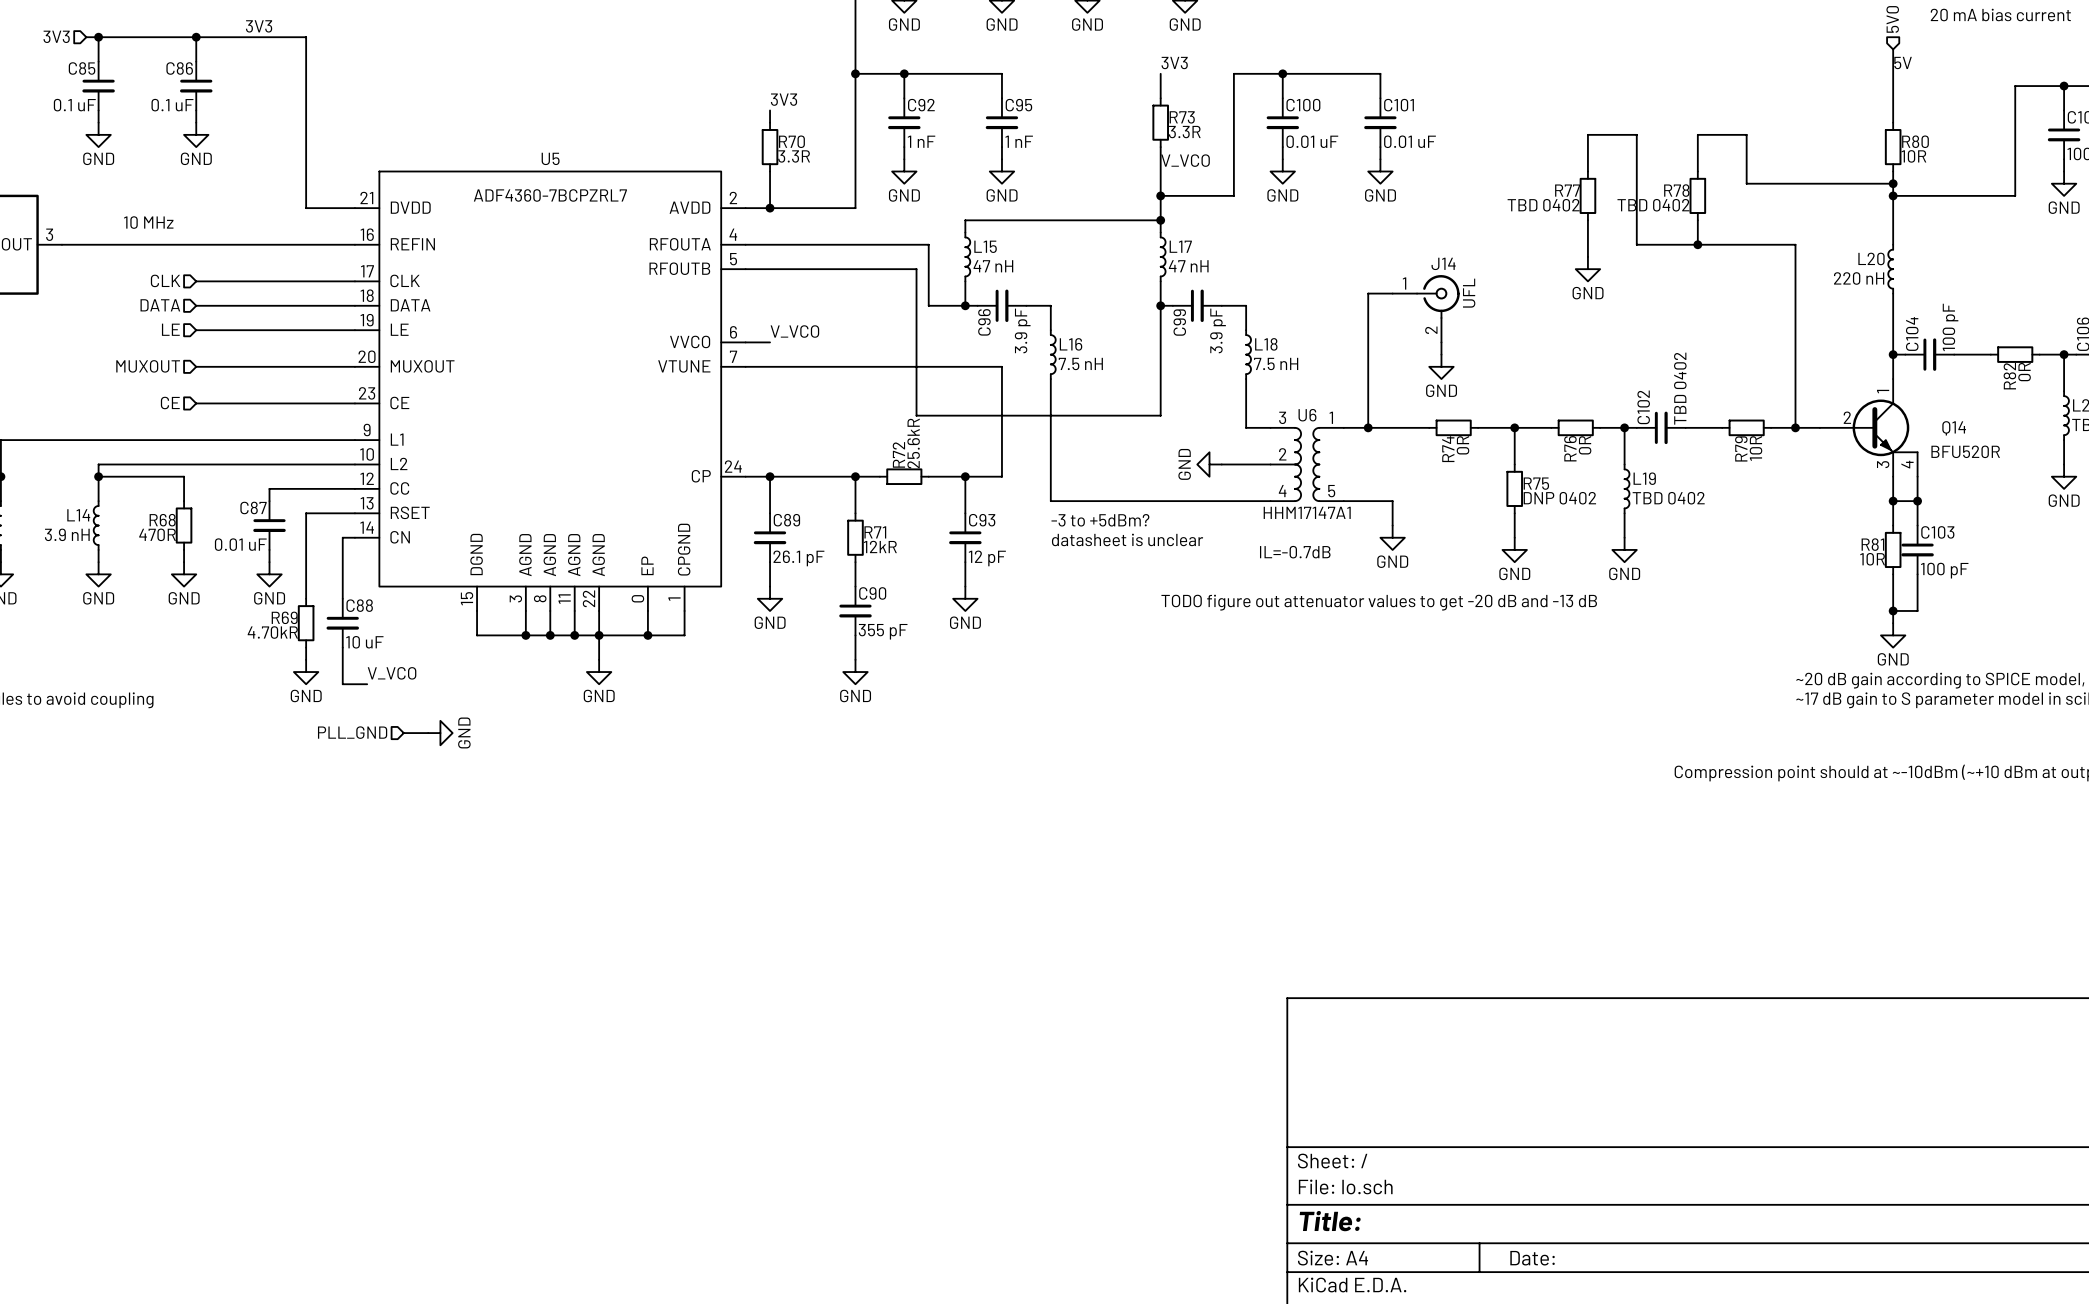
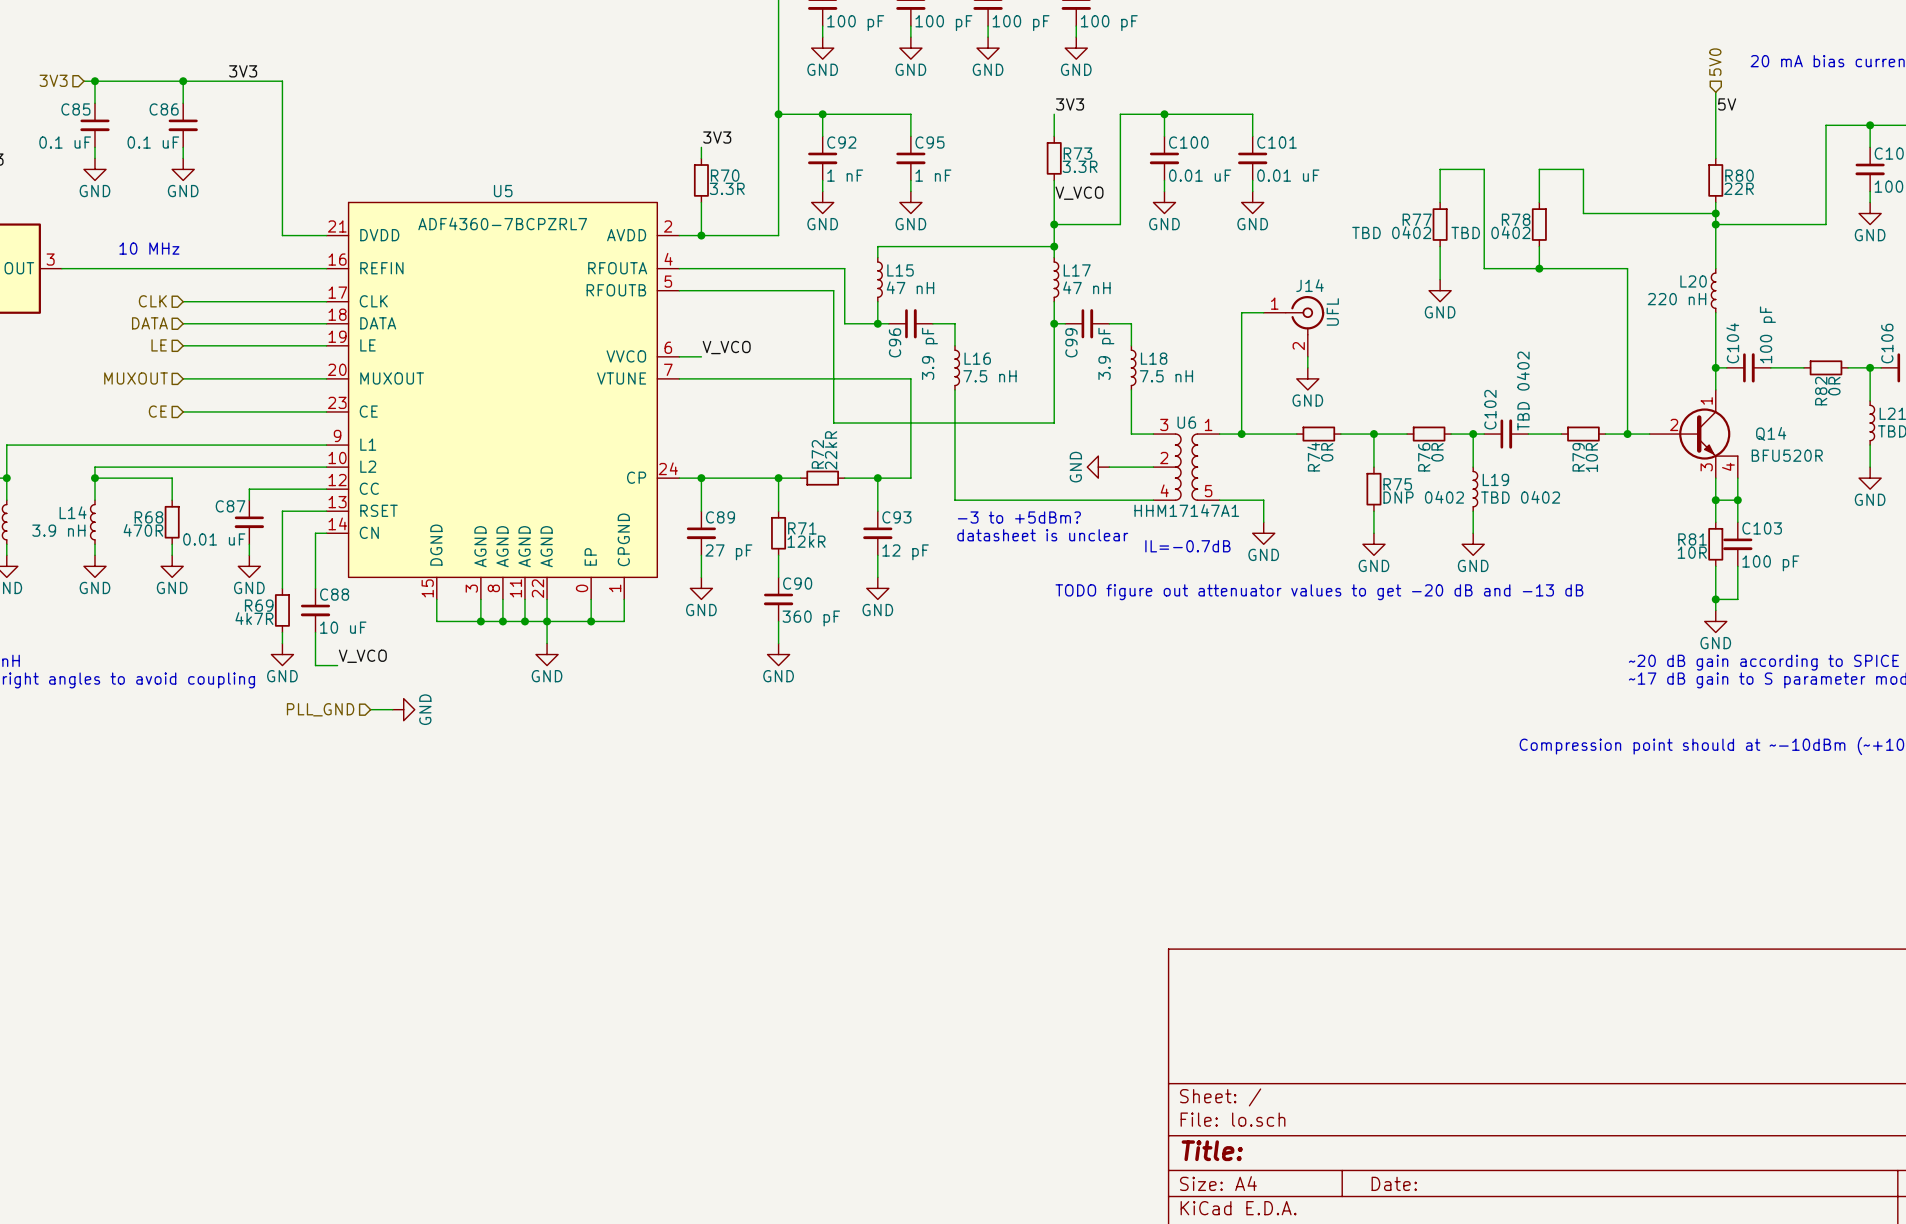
R80 value: 10R (1913, 156) -> 22R (1738, 188)
R72 value: 25.6kR (913, 443) -> 22kR (831, 450)
C89 value: 26.1 pF (798, 558) -> 27 pF (728, 552)
C90 value: 355 pF (883, 631) -> 360 pF (811, 618)
R69 value: 4.70kR (272, 632) -> 4k7R (254, 618)

